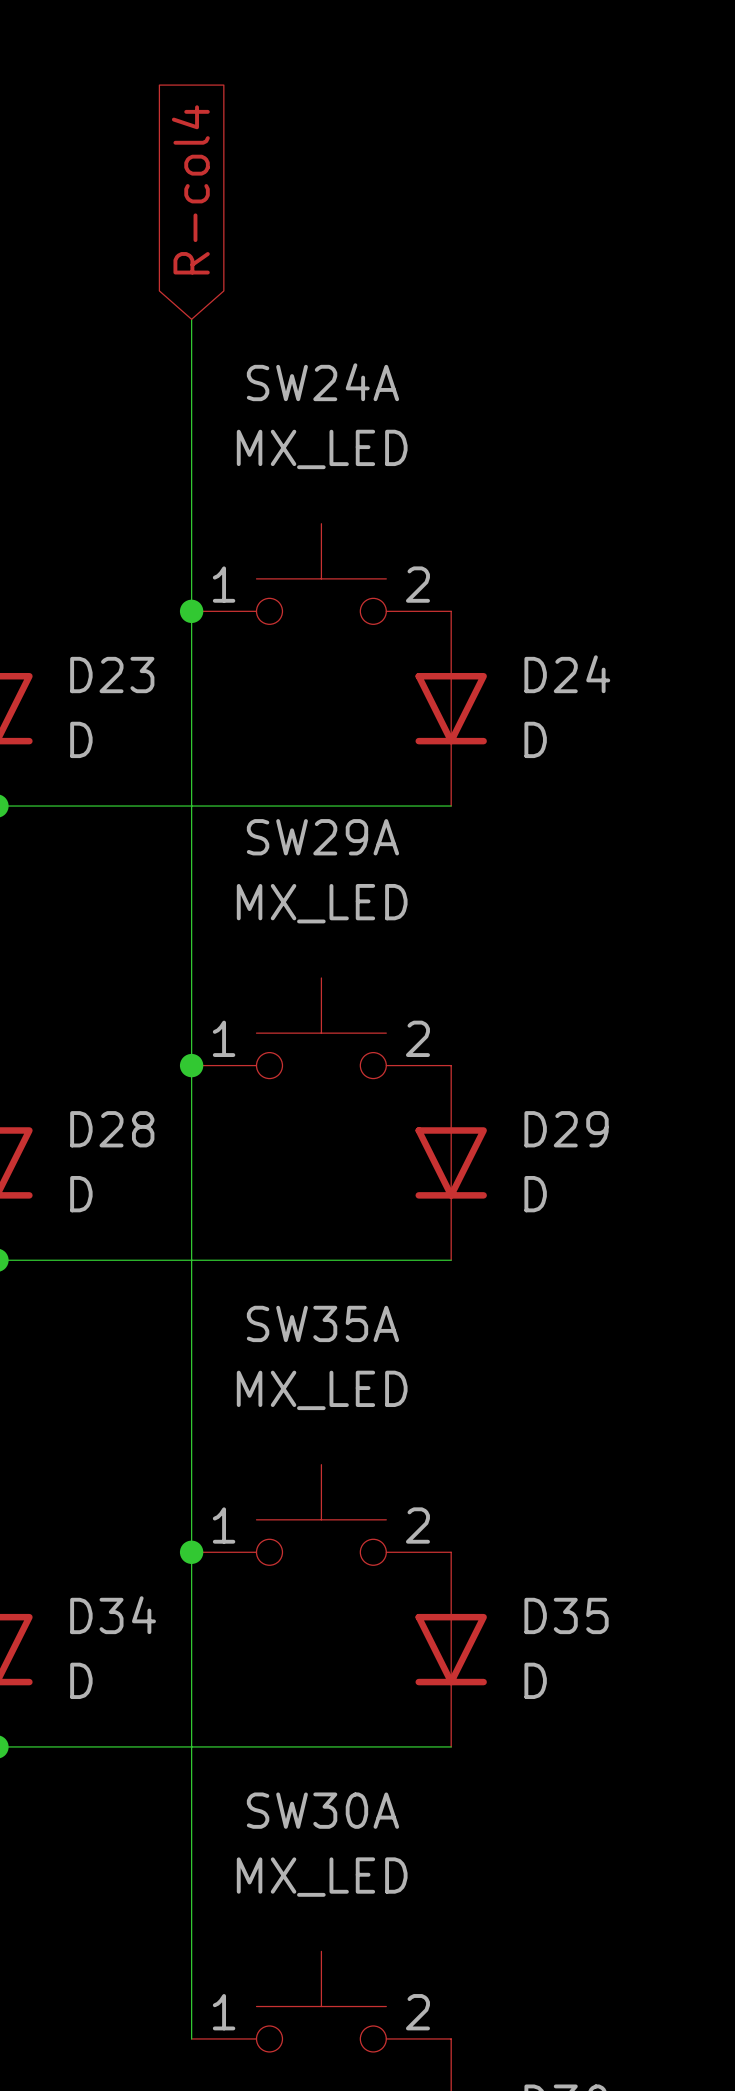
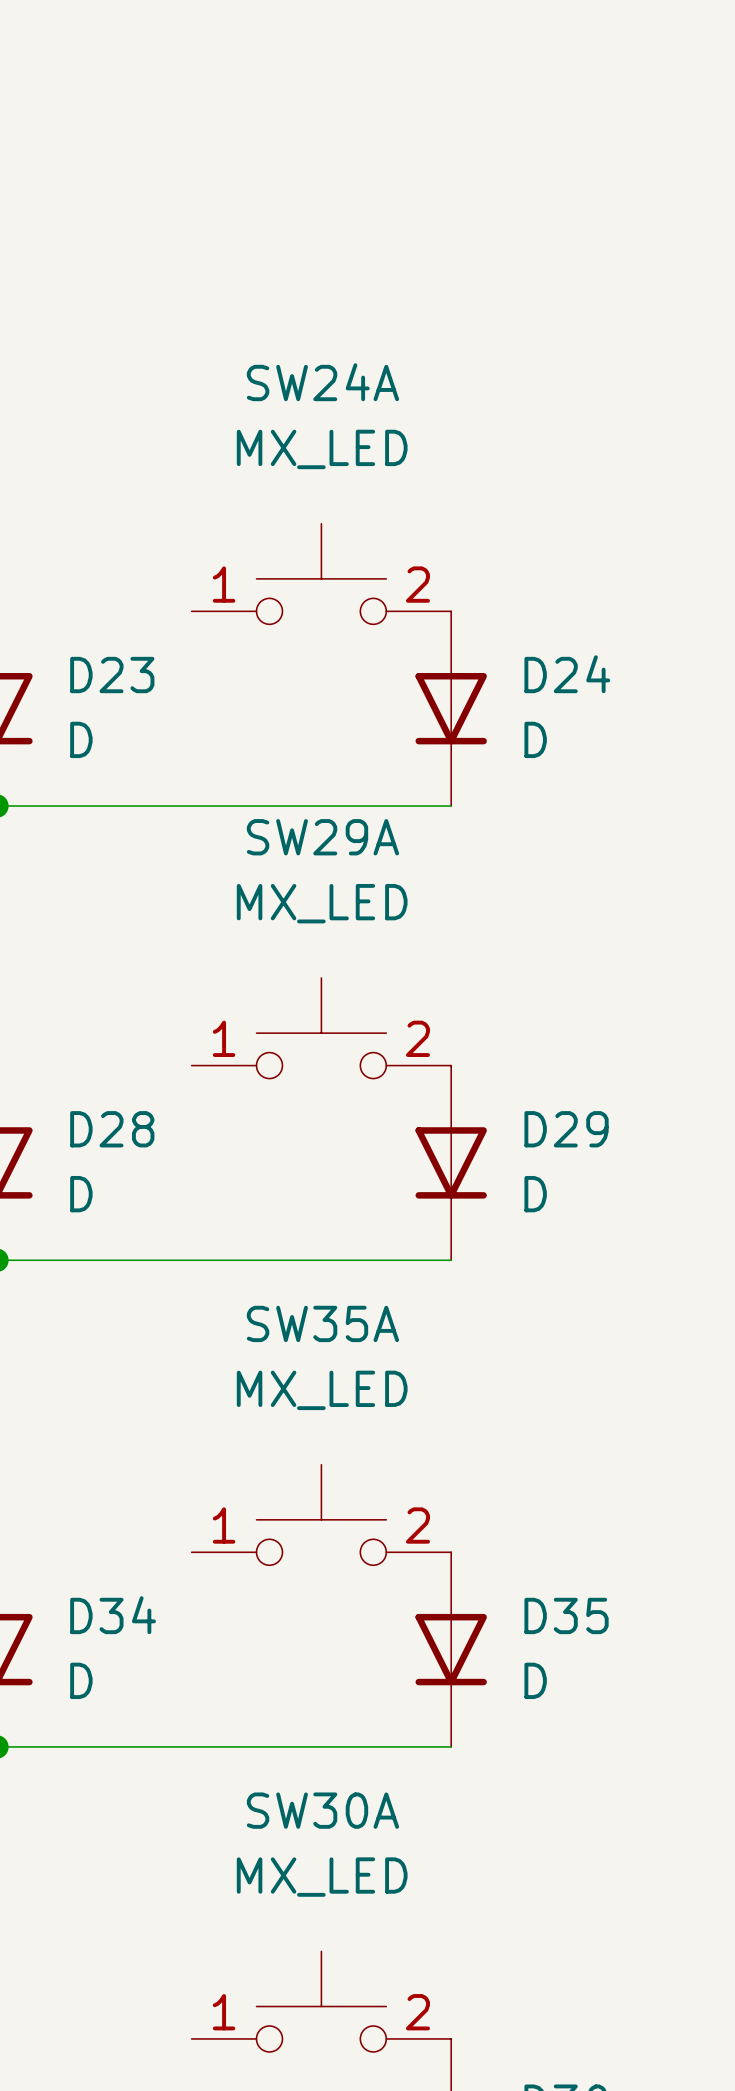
global label: R-col4 (190, 189) -> none
wire: (191, 319) (191, 2038) -> none
junction: (191, 611) -> none
junction: (191, 1065) -> none
junction: (191, 1552) -> none

